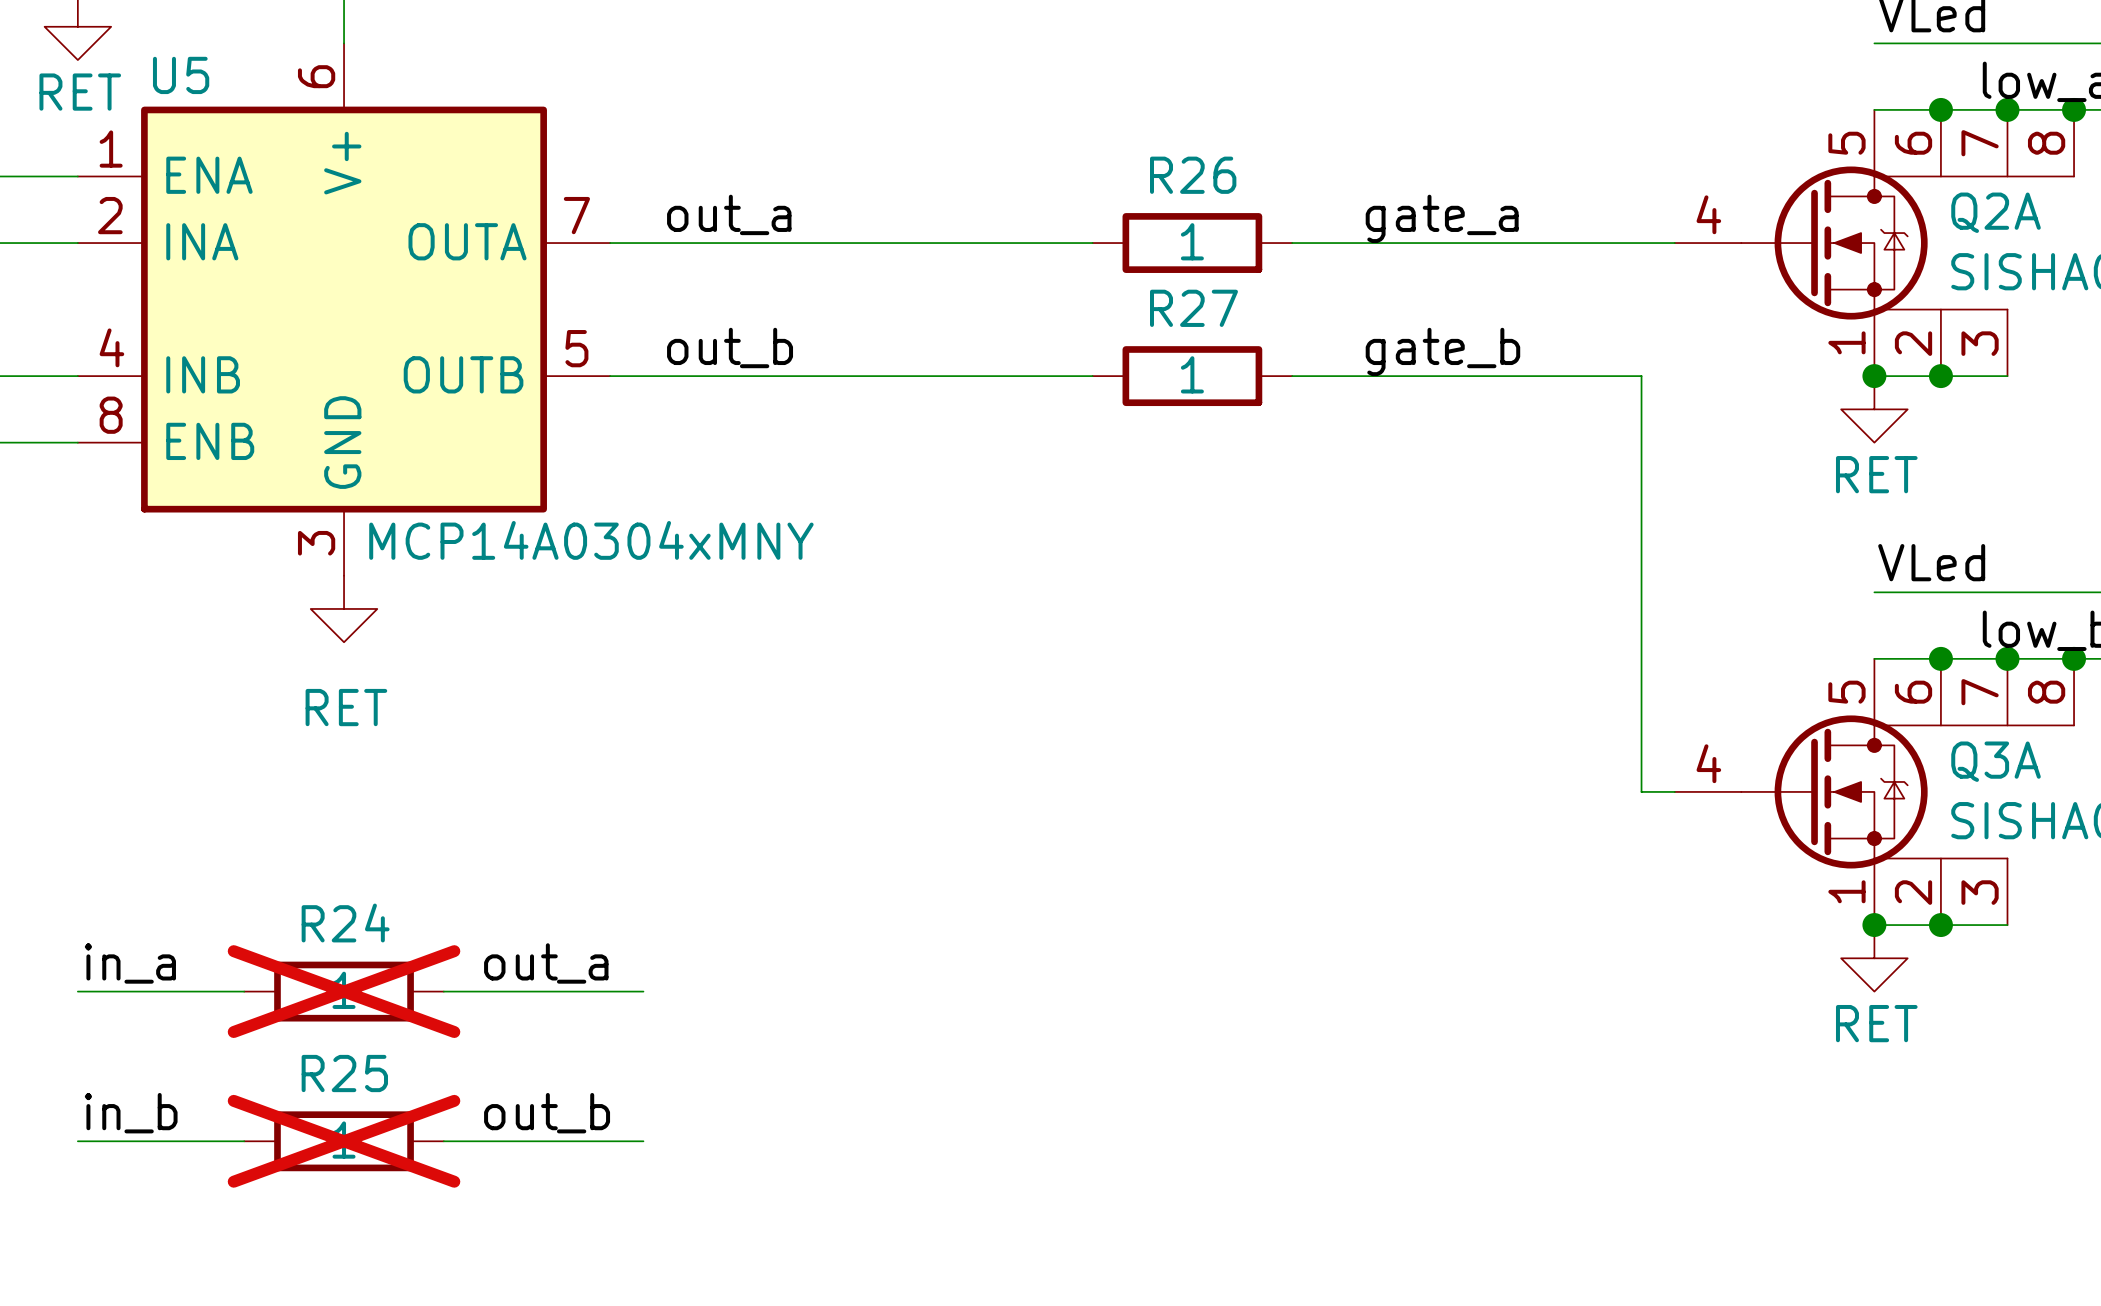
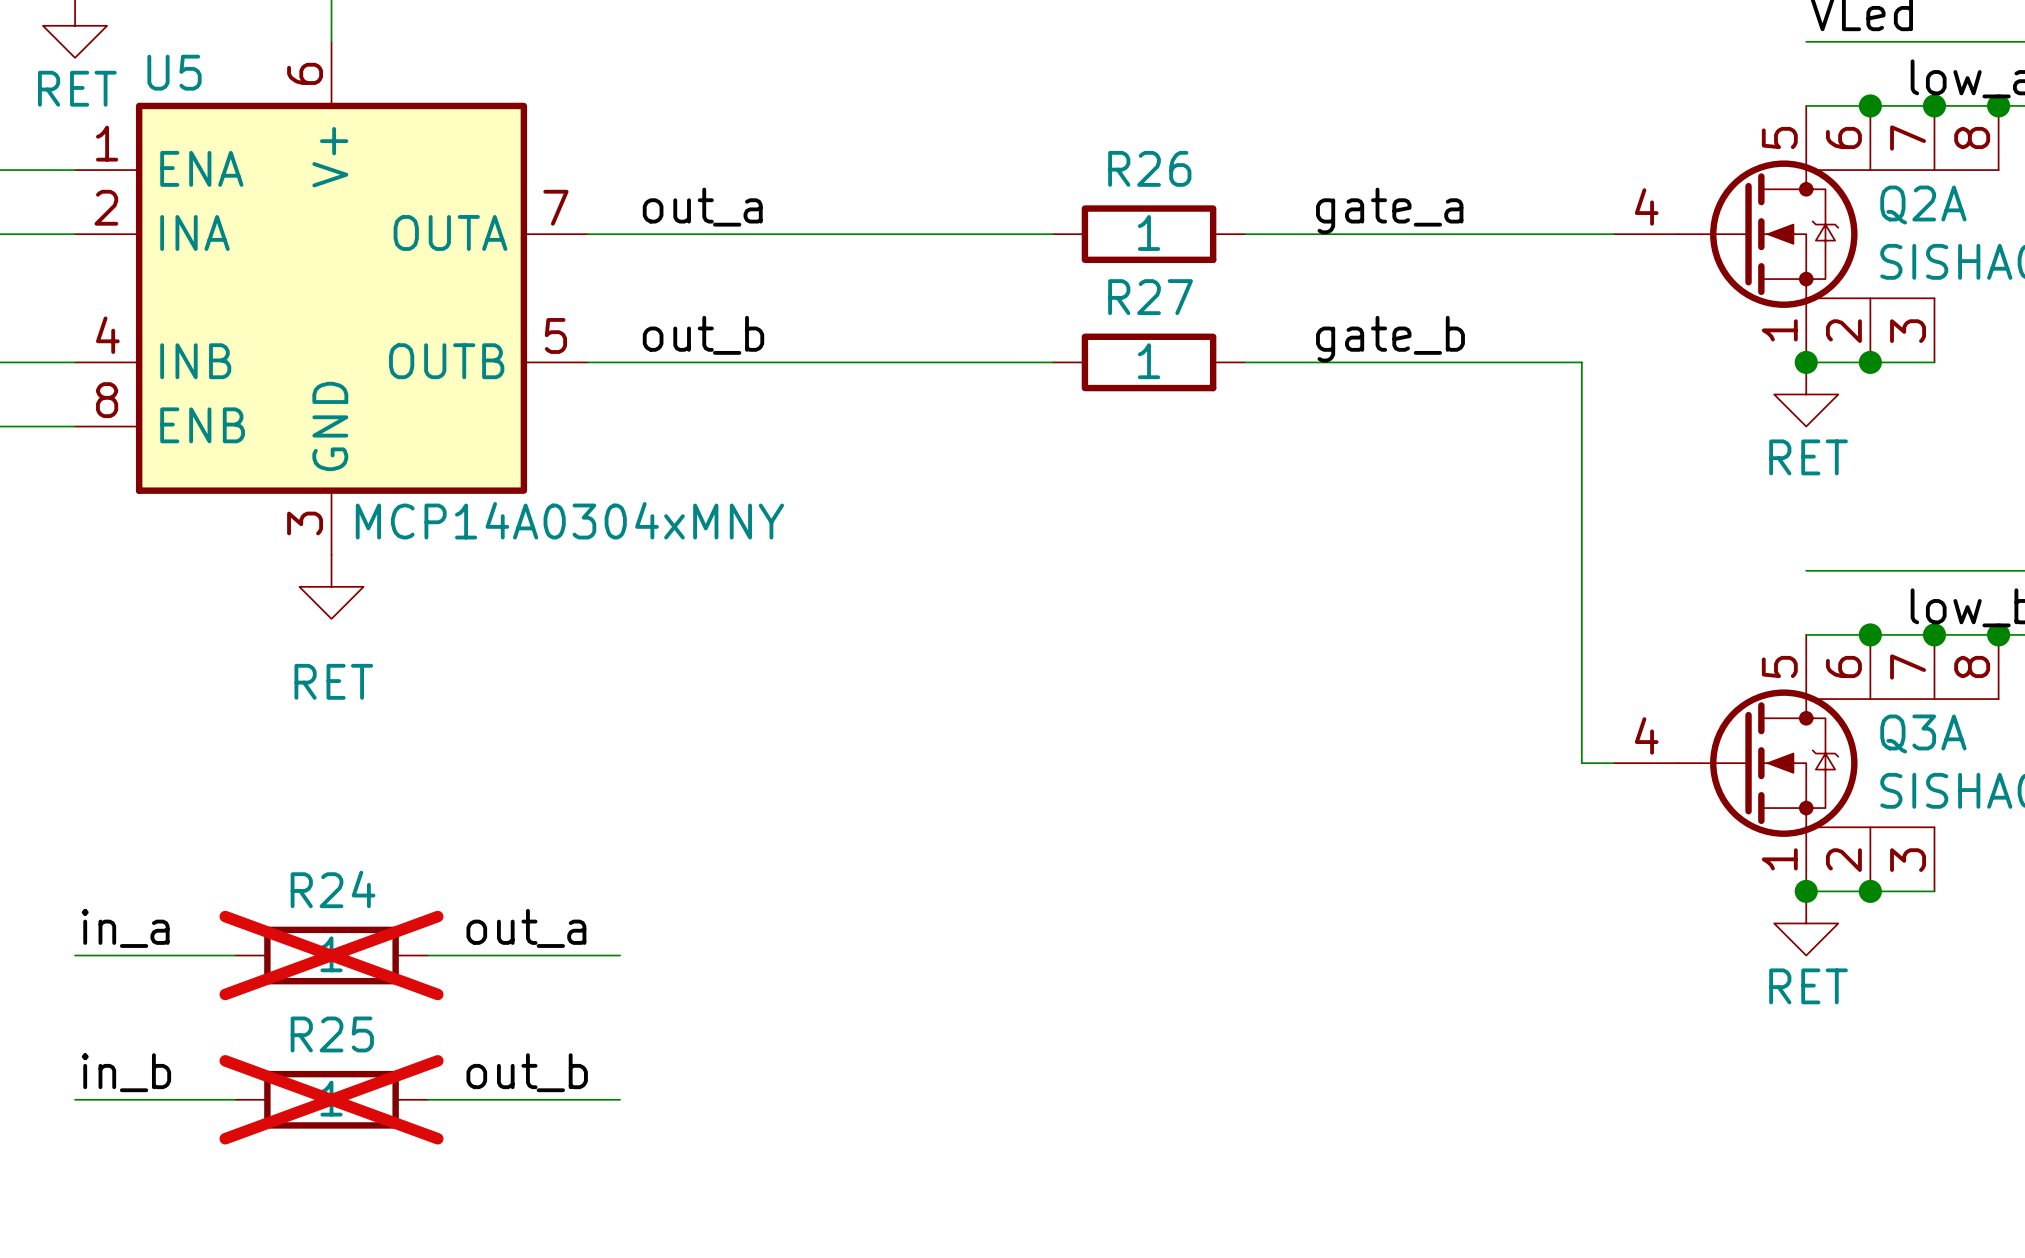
label: VLed (1931, 562) -> none

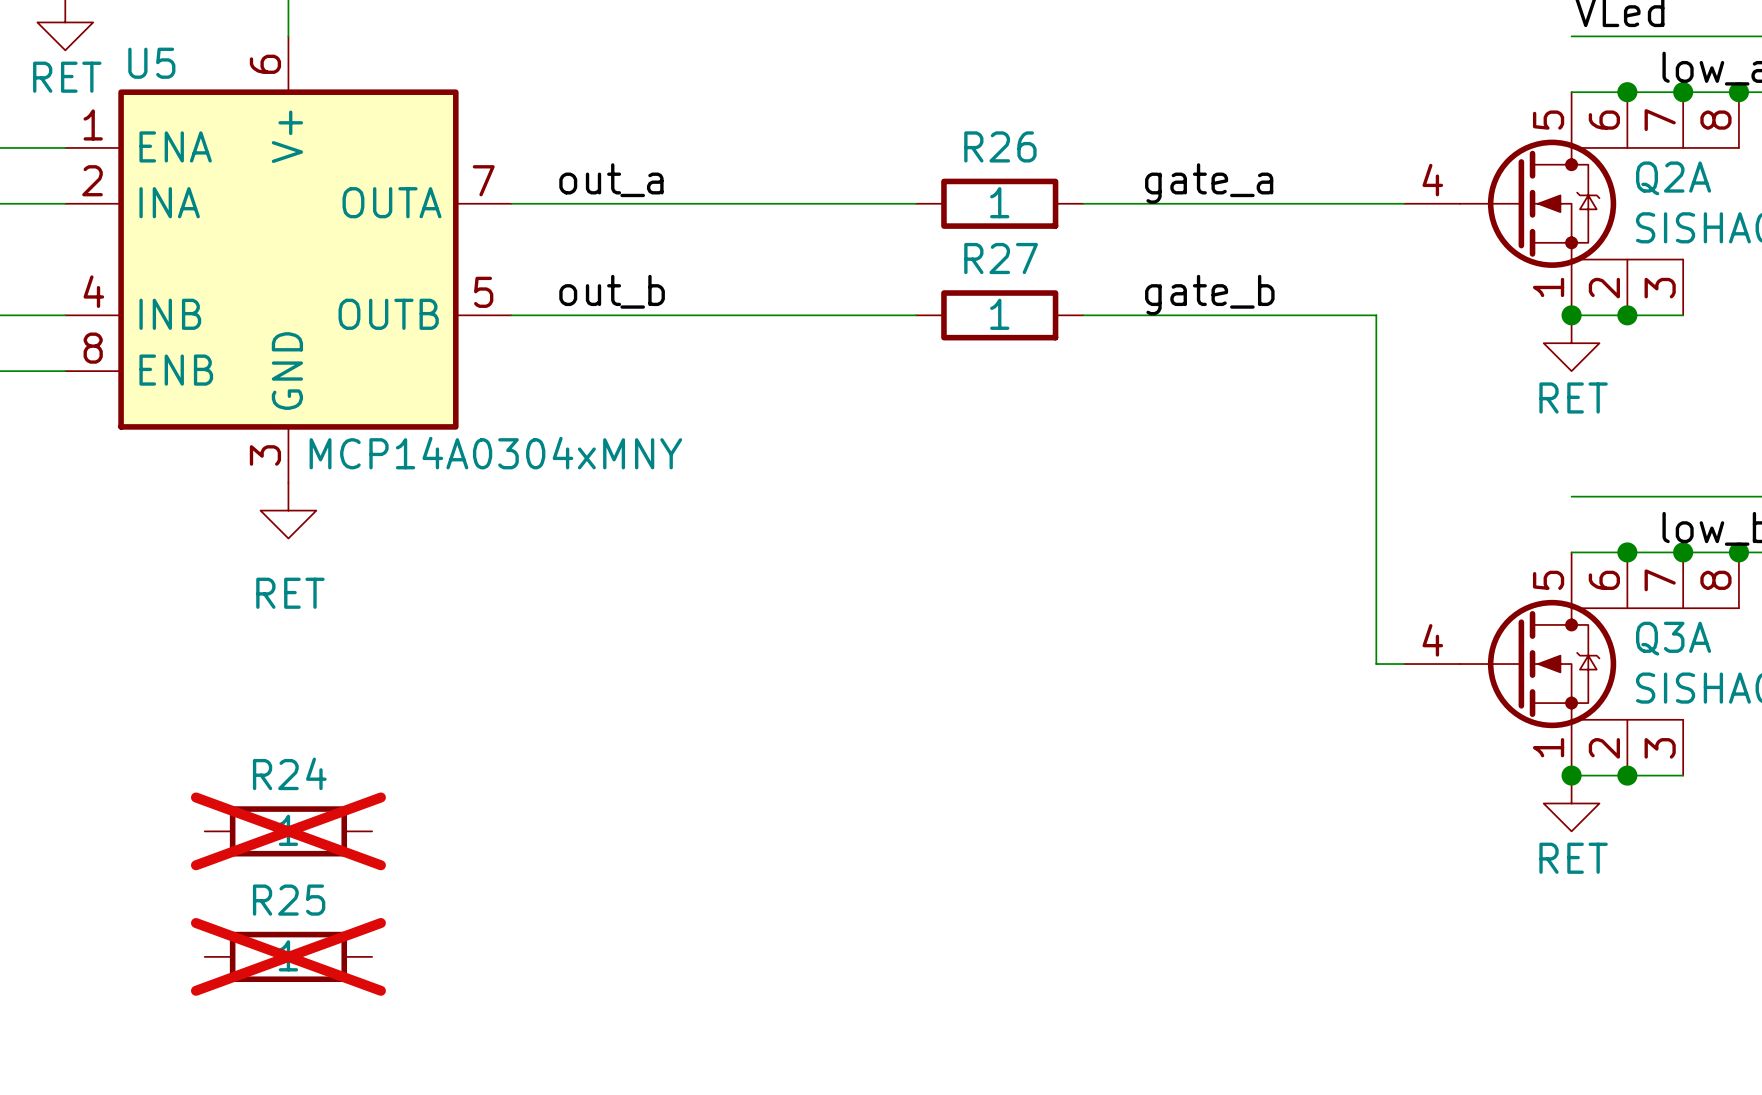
label: in_a (125, 928) -> none
label: out_a (526, 928) -> none
wire: (75, 955) (235, 955) -> none
wire: (427, 955) (620, 955) -> none
label: in_b (126, 1072) -> none
label: out_b (527, 1072) -> none
wire: (75, 1099) (235, 1099) -> none
wire: (427, 1099) (620, 1099) -> none

